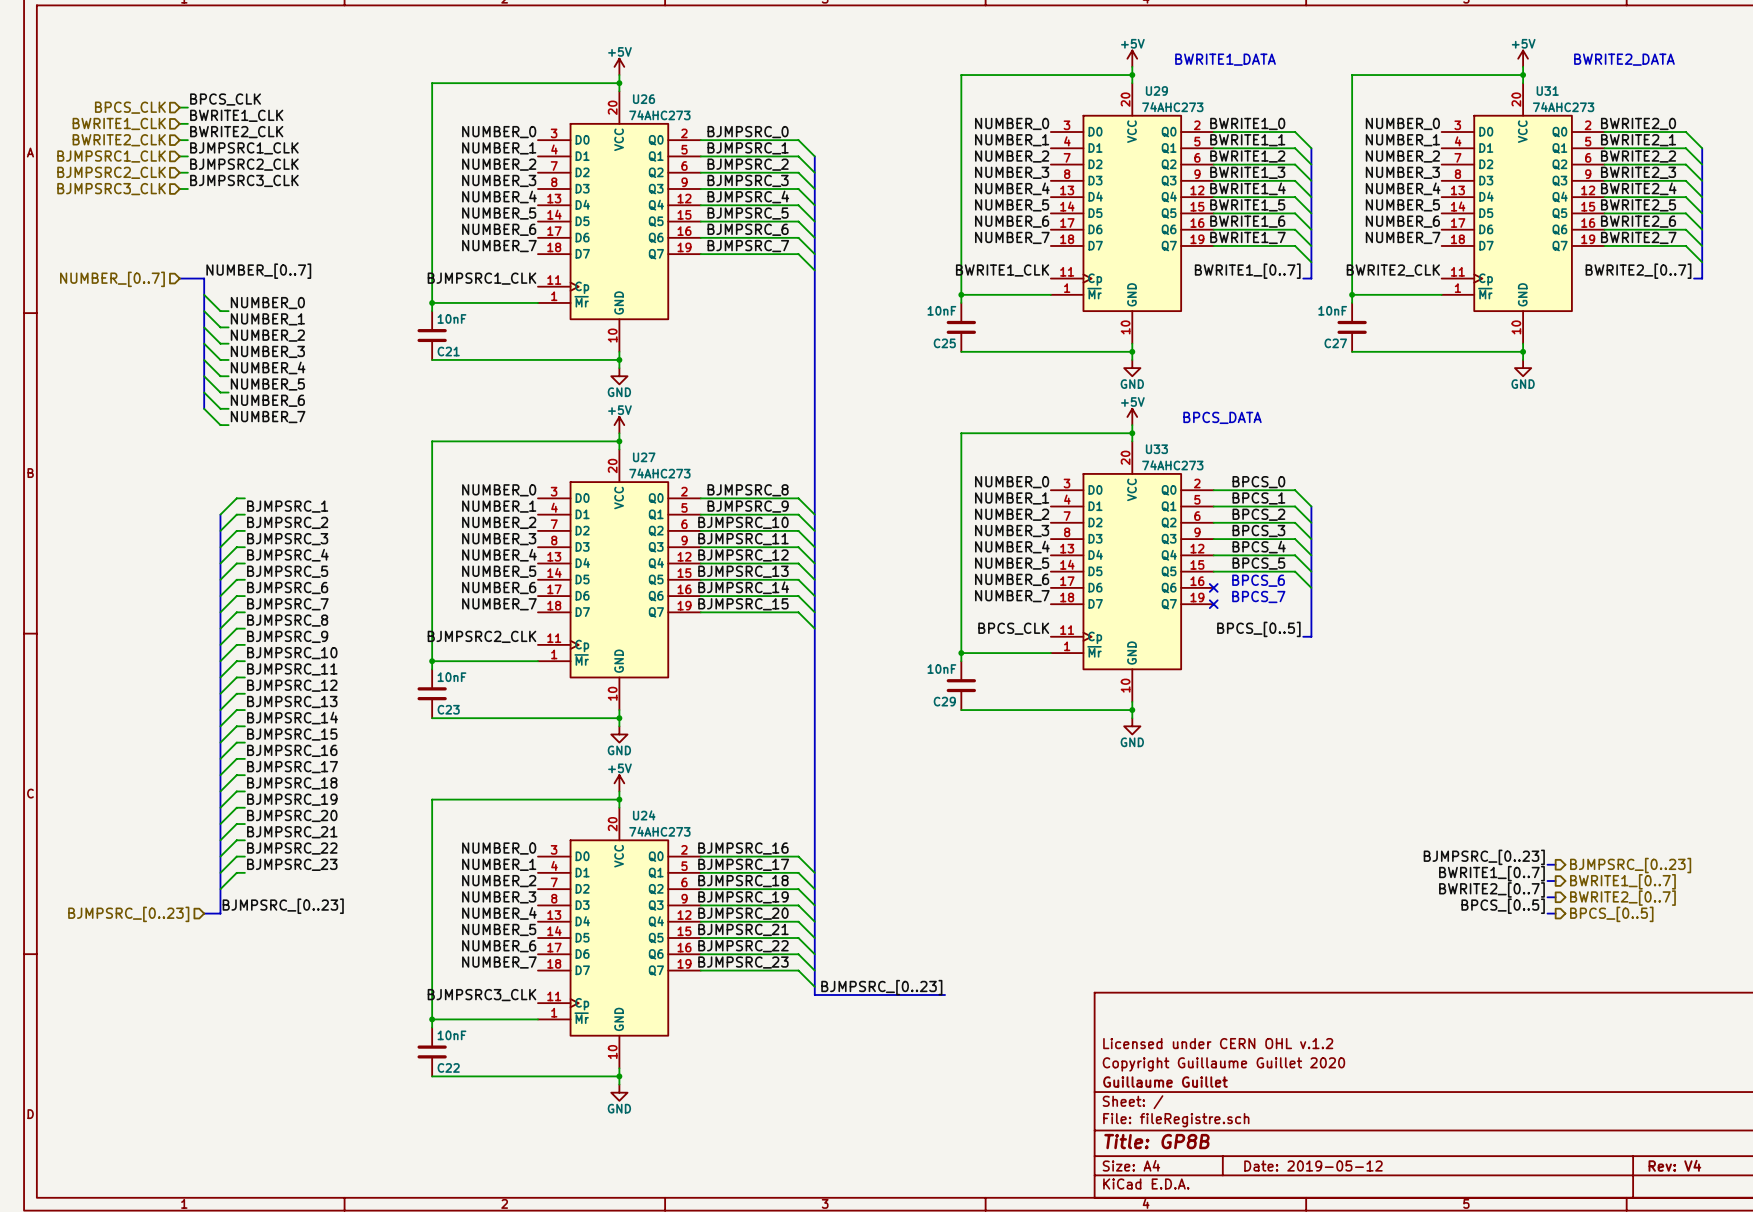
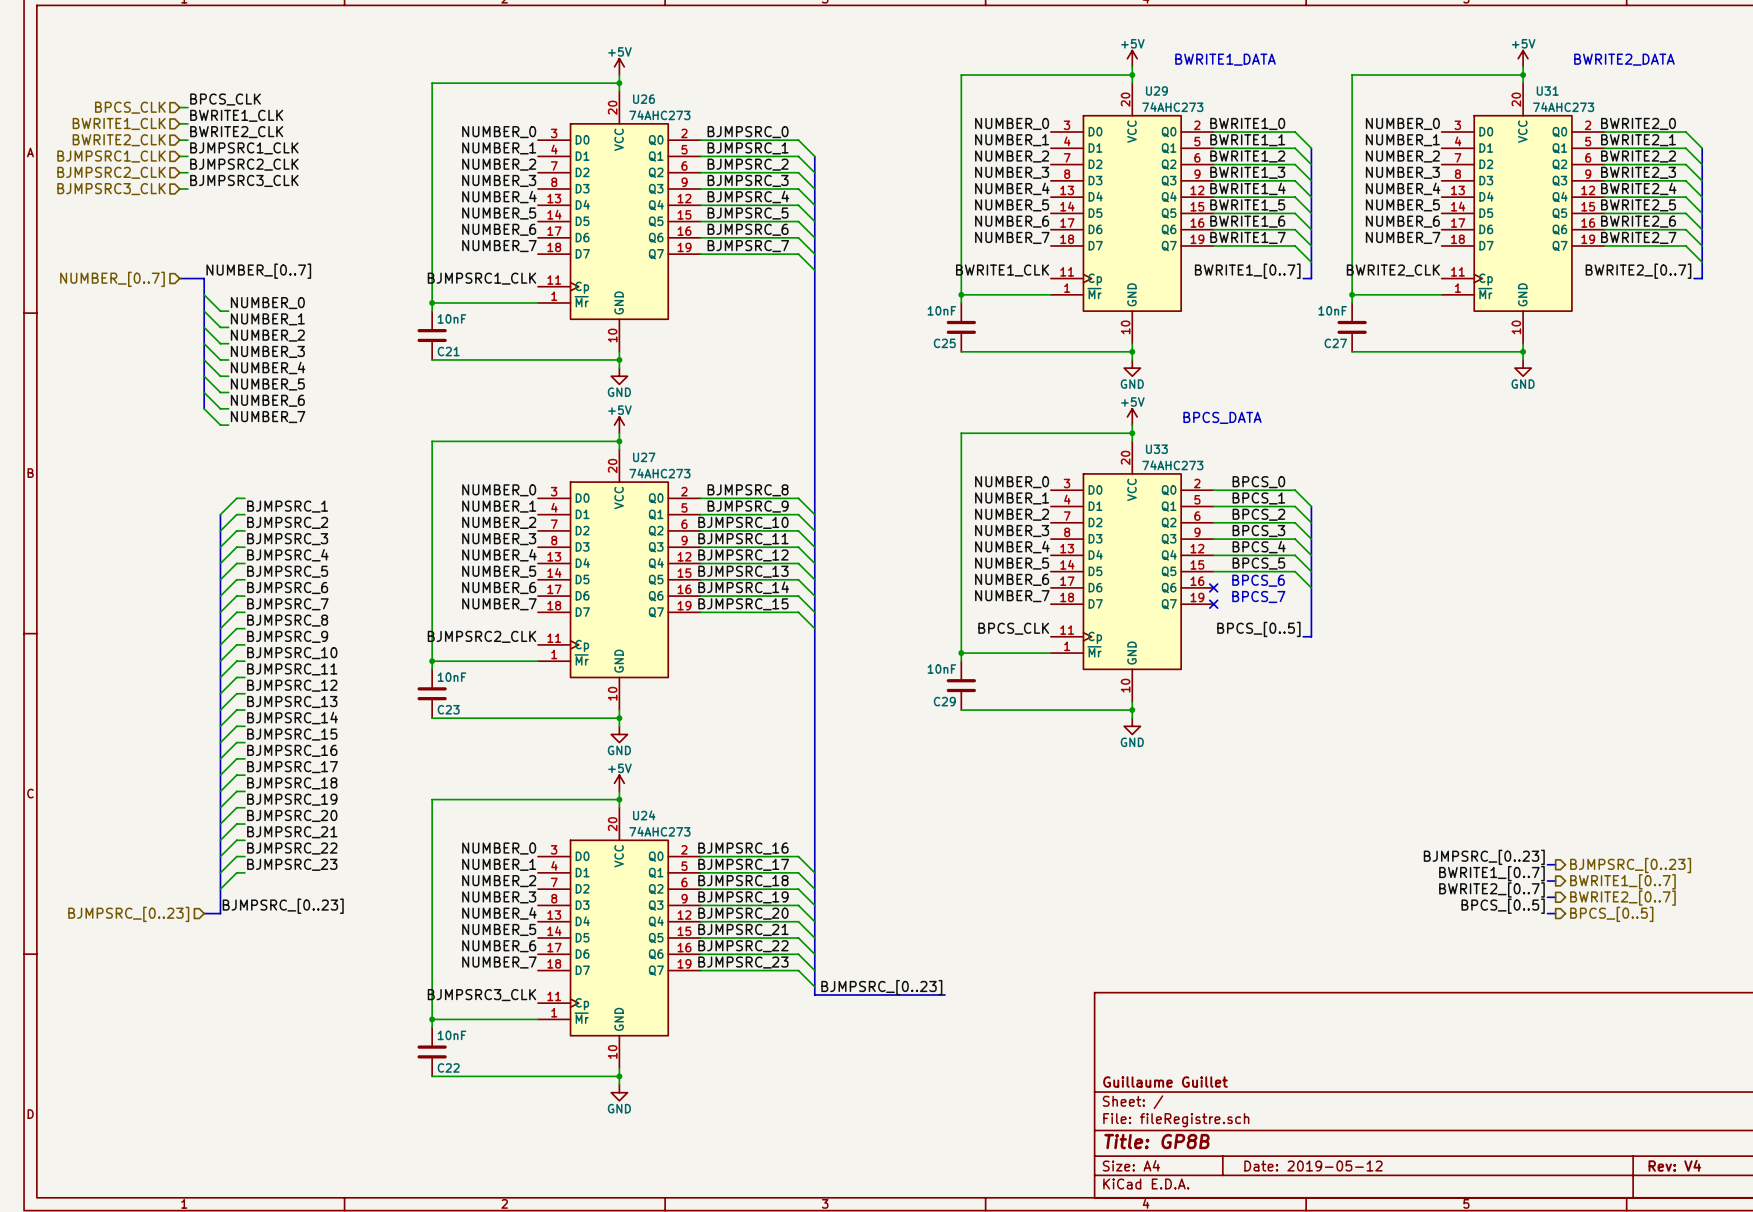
title block: Licensed under CERN OHL v.1.2 (1218, 1043) -> none
title block: Copyright Guillaume Guillet 2020 (1223, 1064) -> none

